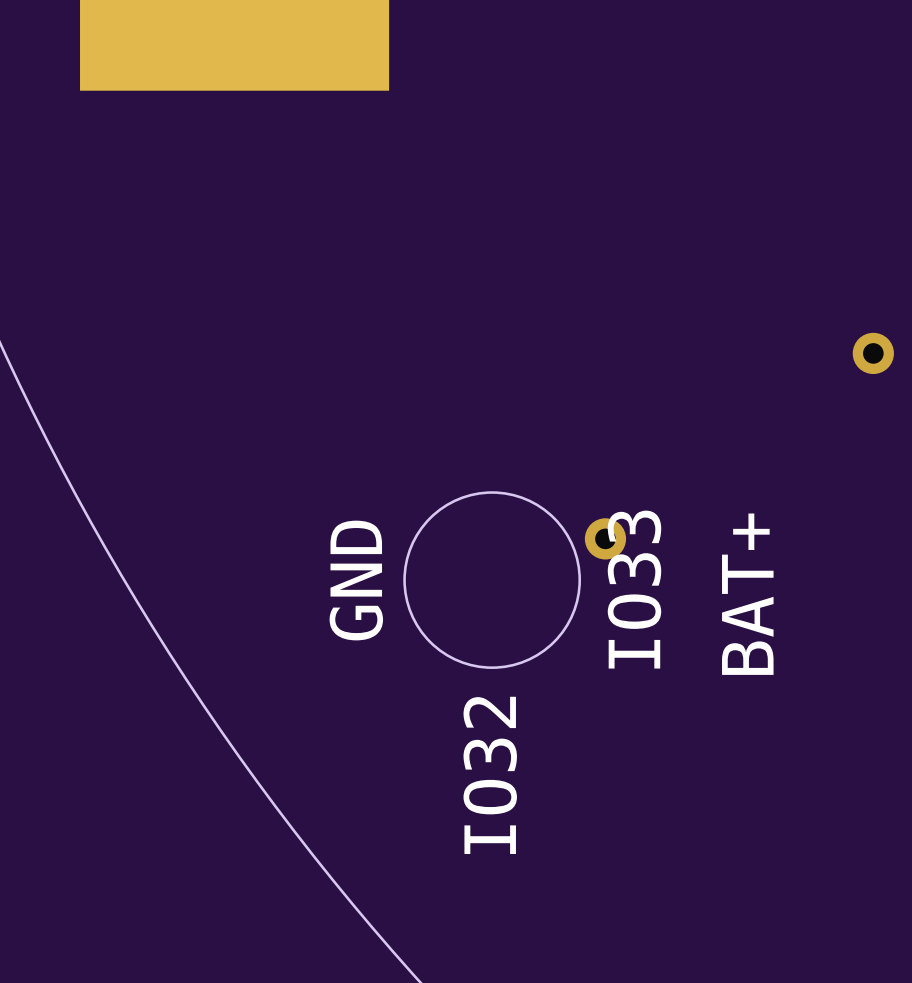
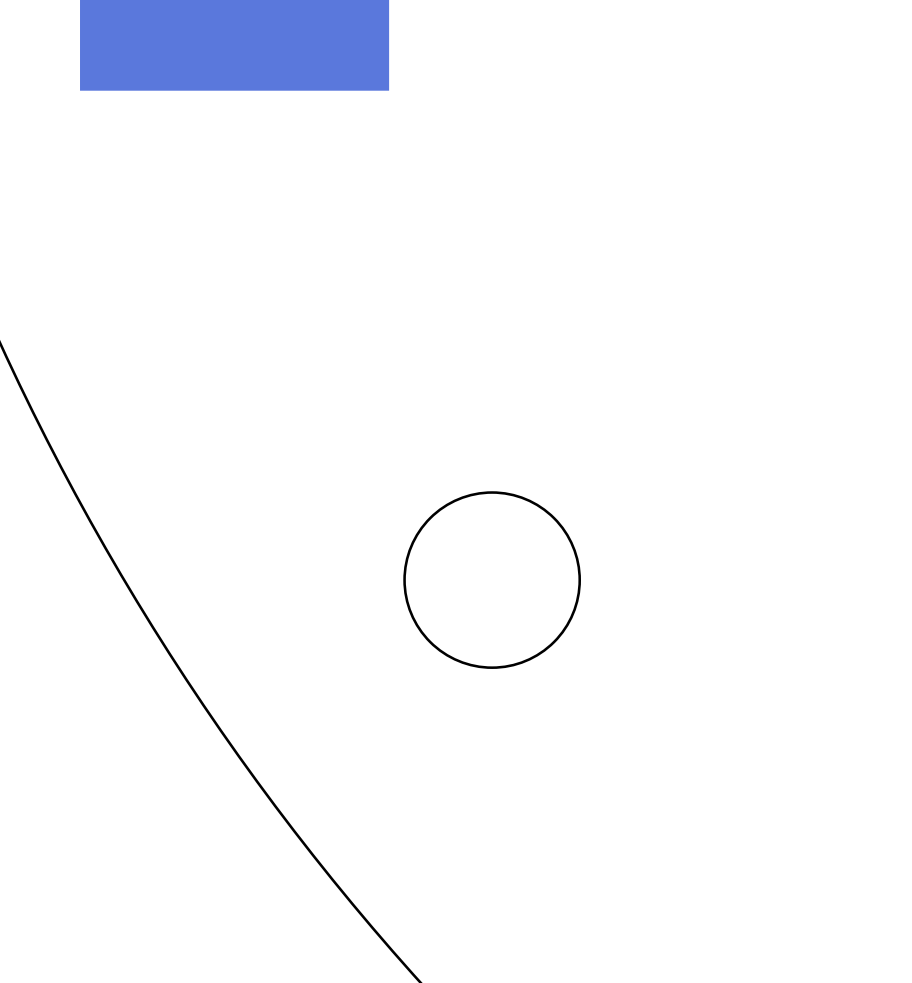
via: (873, 353) -> none
via: (605, 538) -> none
text: GND (356, 580) -> none
text: IO33 (634, 589) -> none
text: BAT+ (747, 594) -> none
text: IO32 (490, 775) -> none

